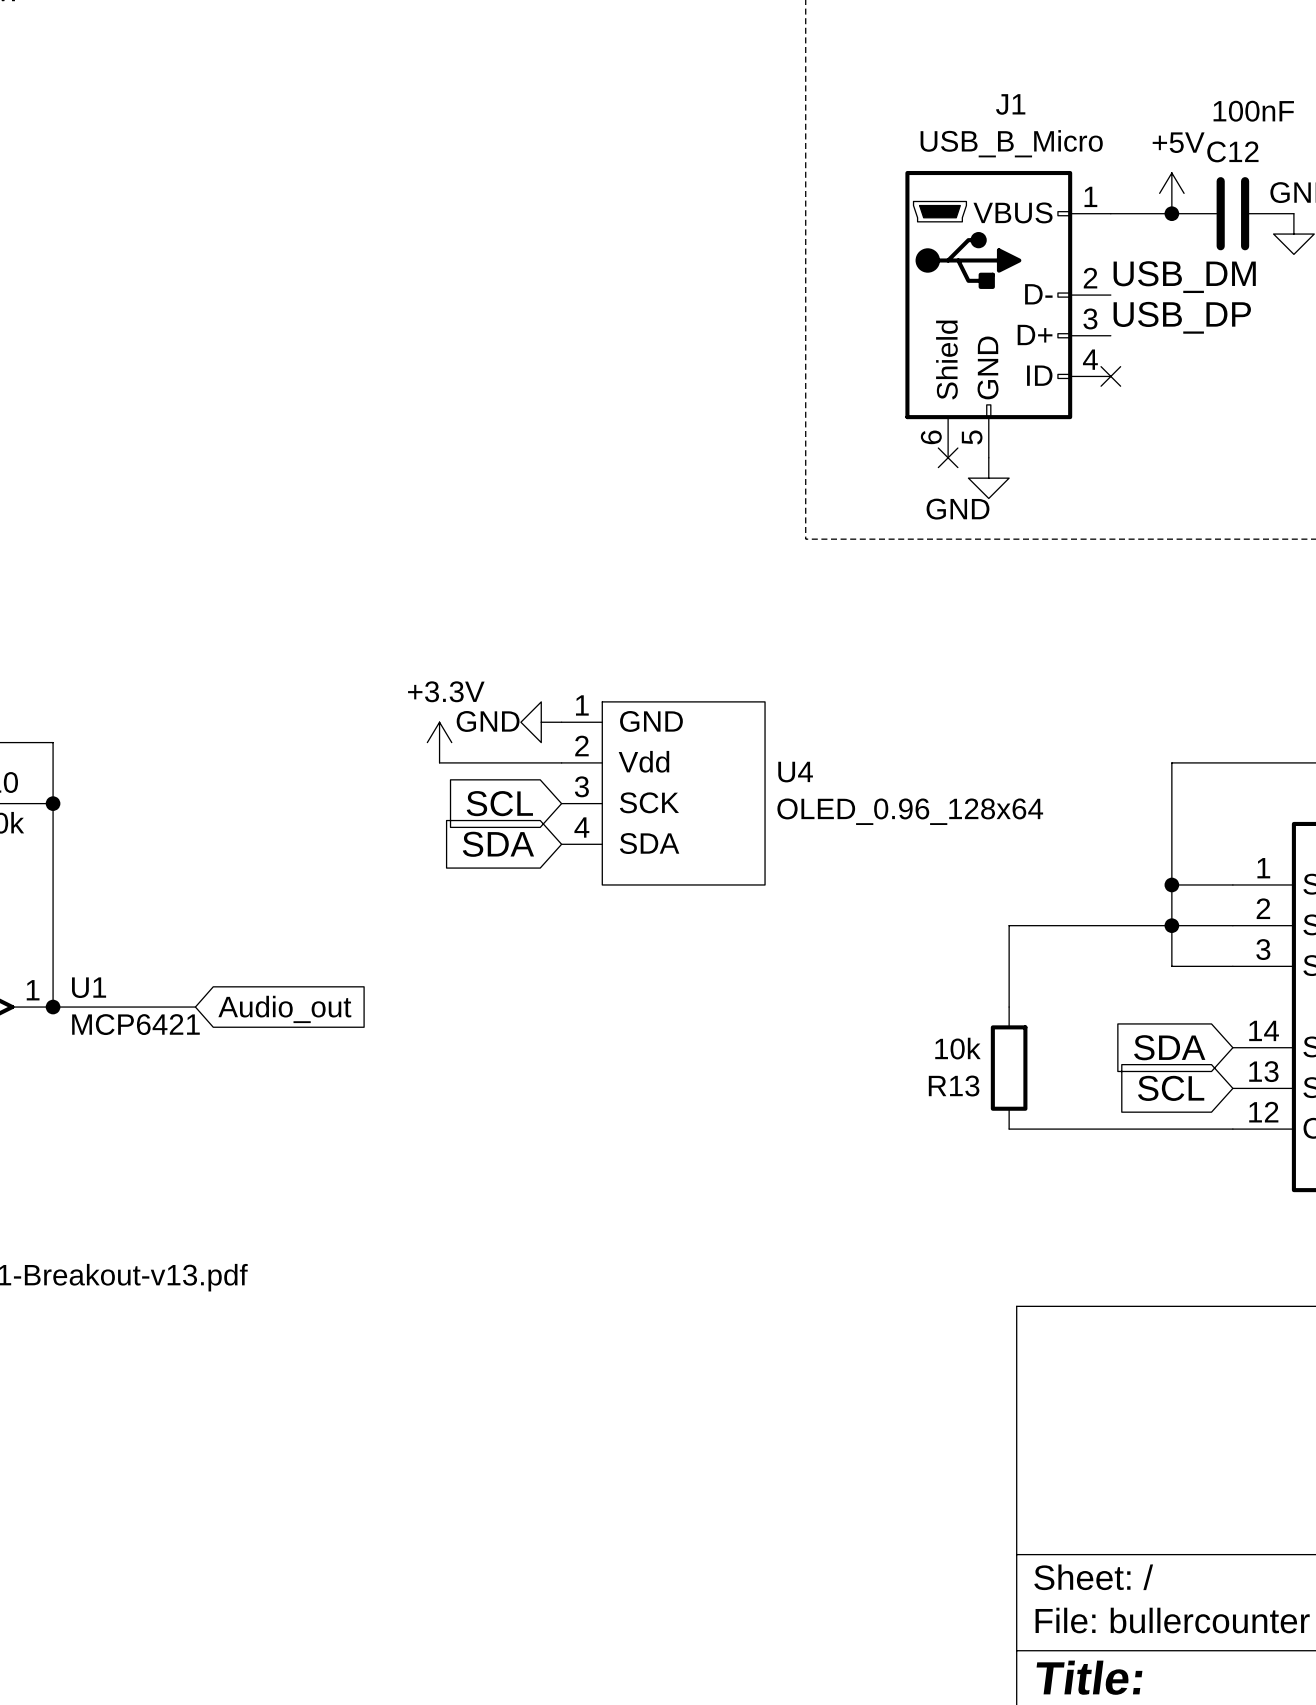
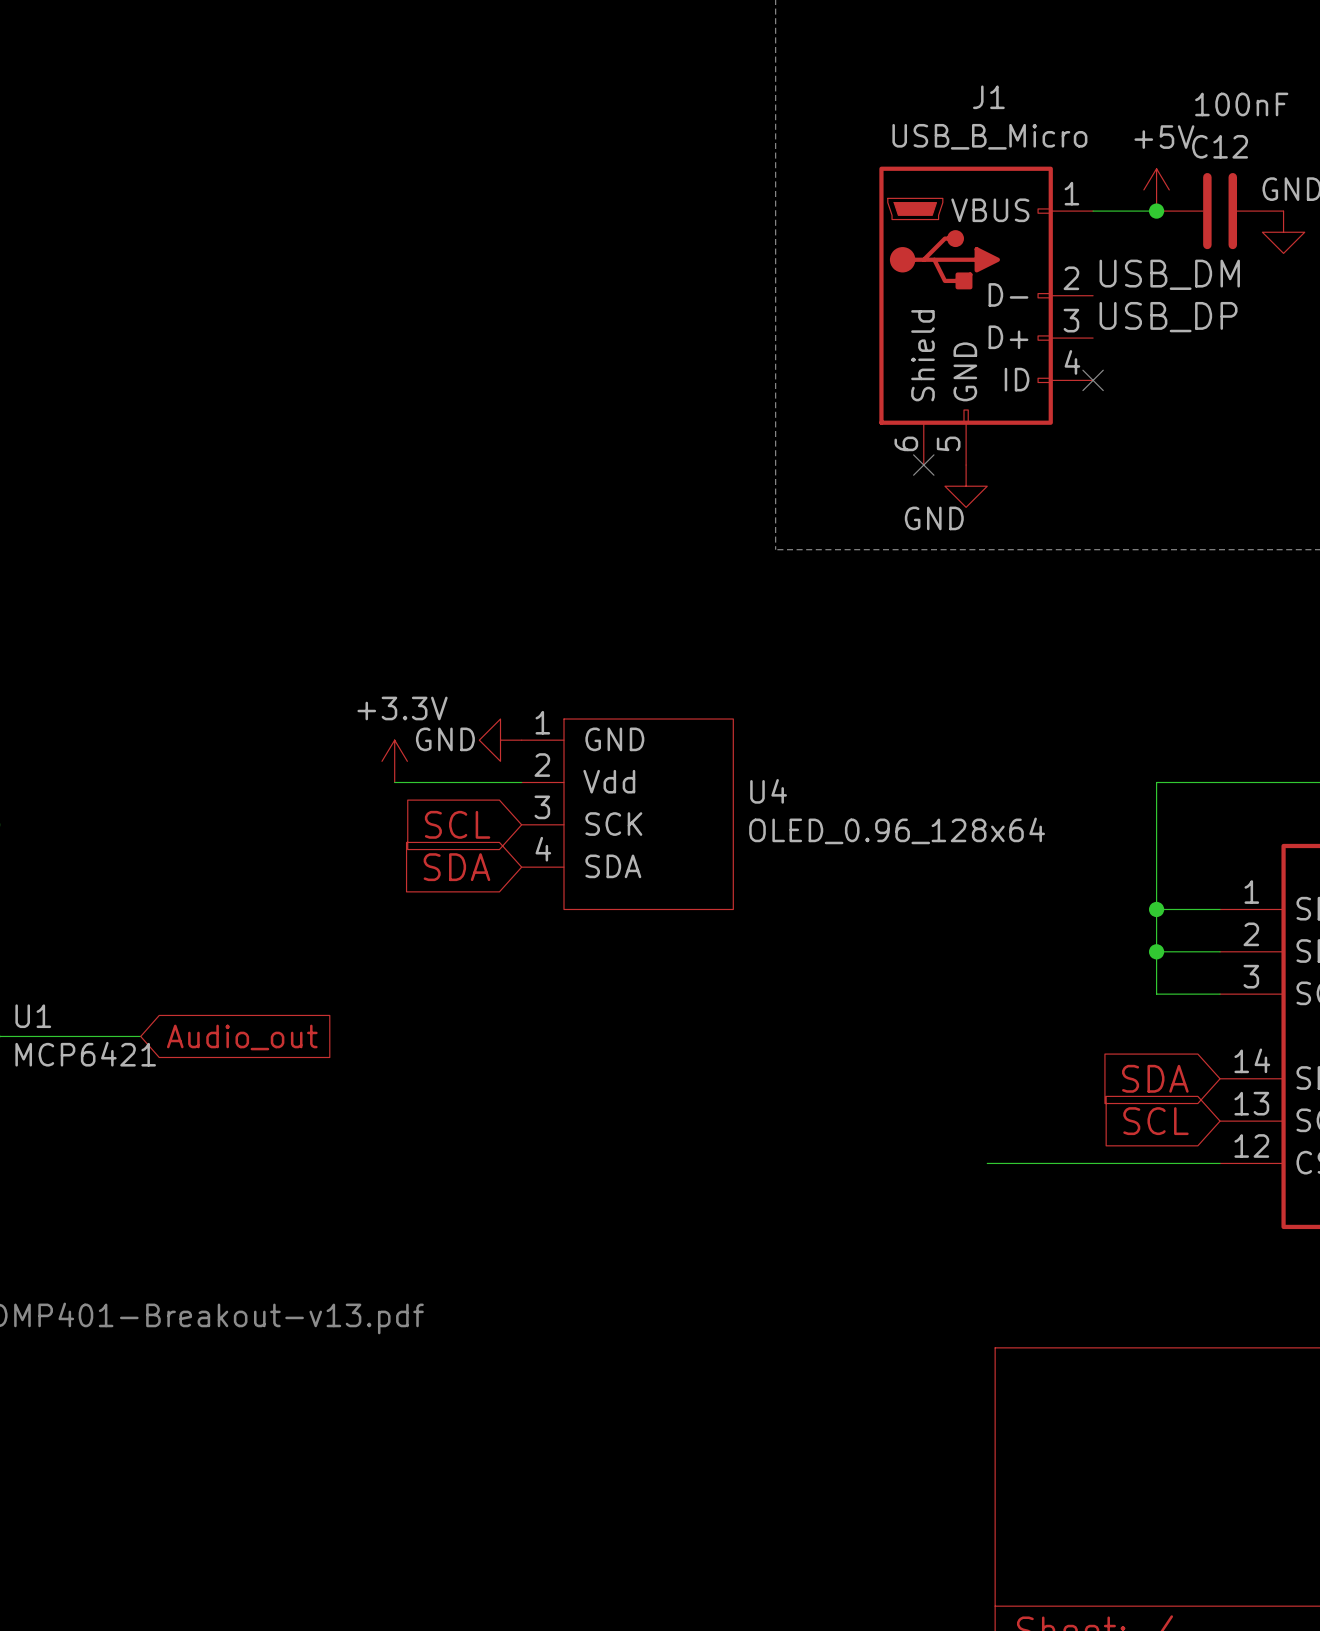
wire: (1171, 925) (1009, 925) (1009, 1007) -> none
R13: 10k (1009, 1068) -> none

